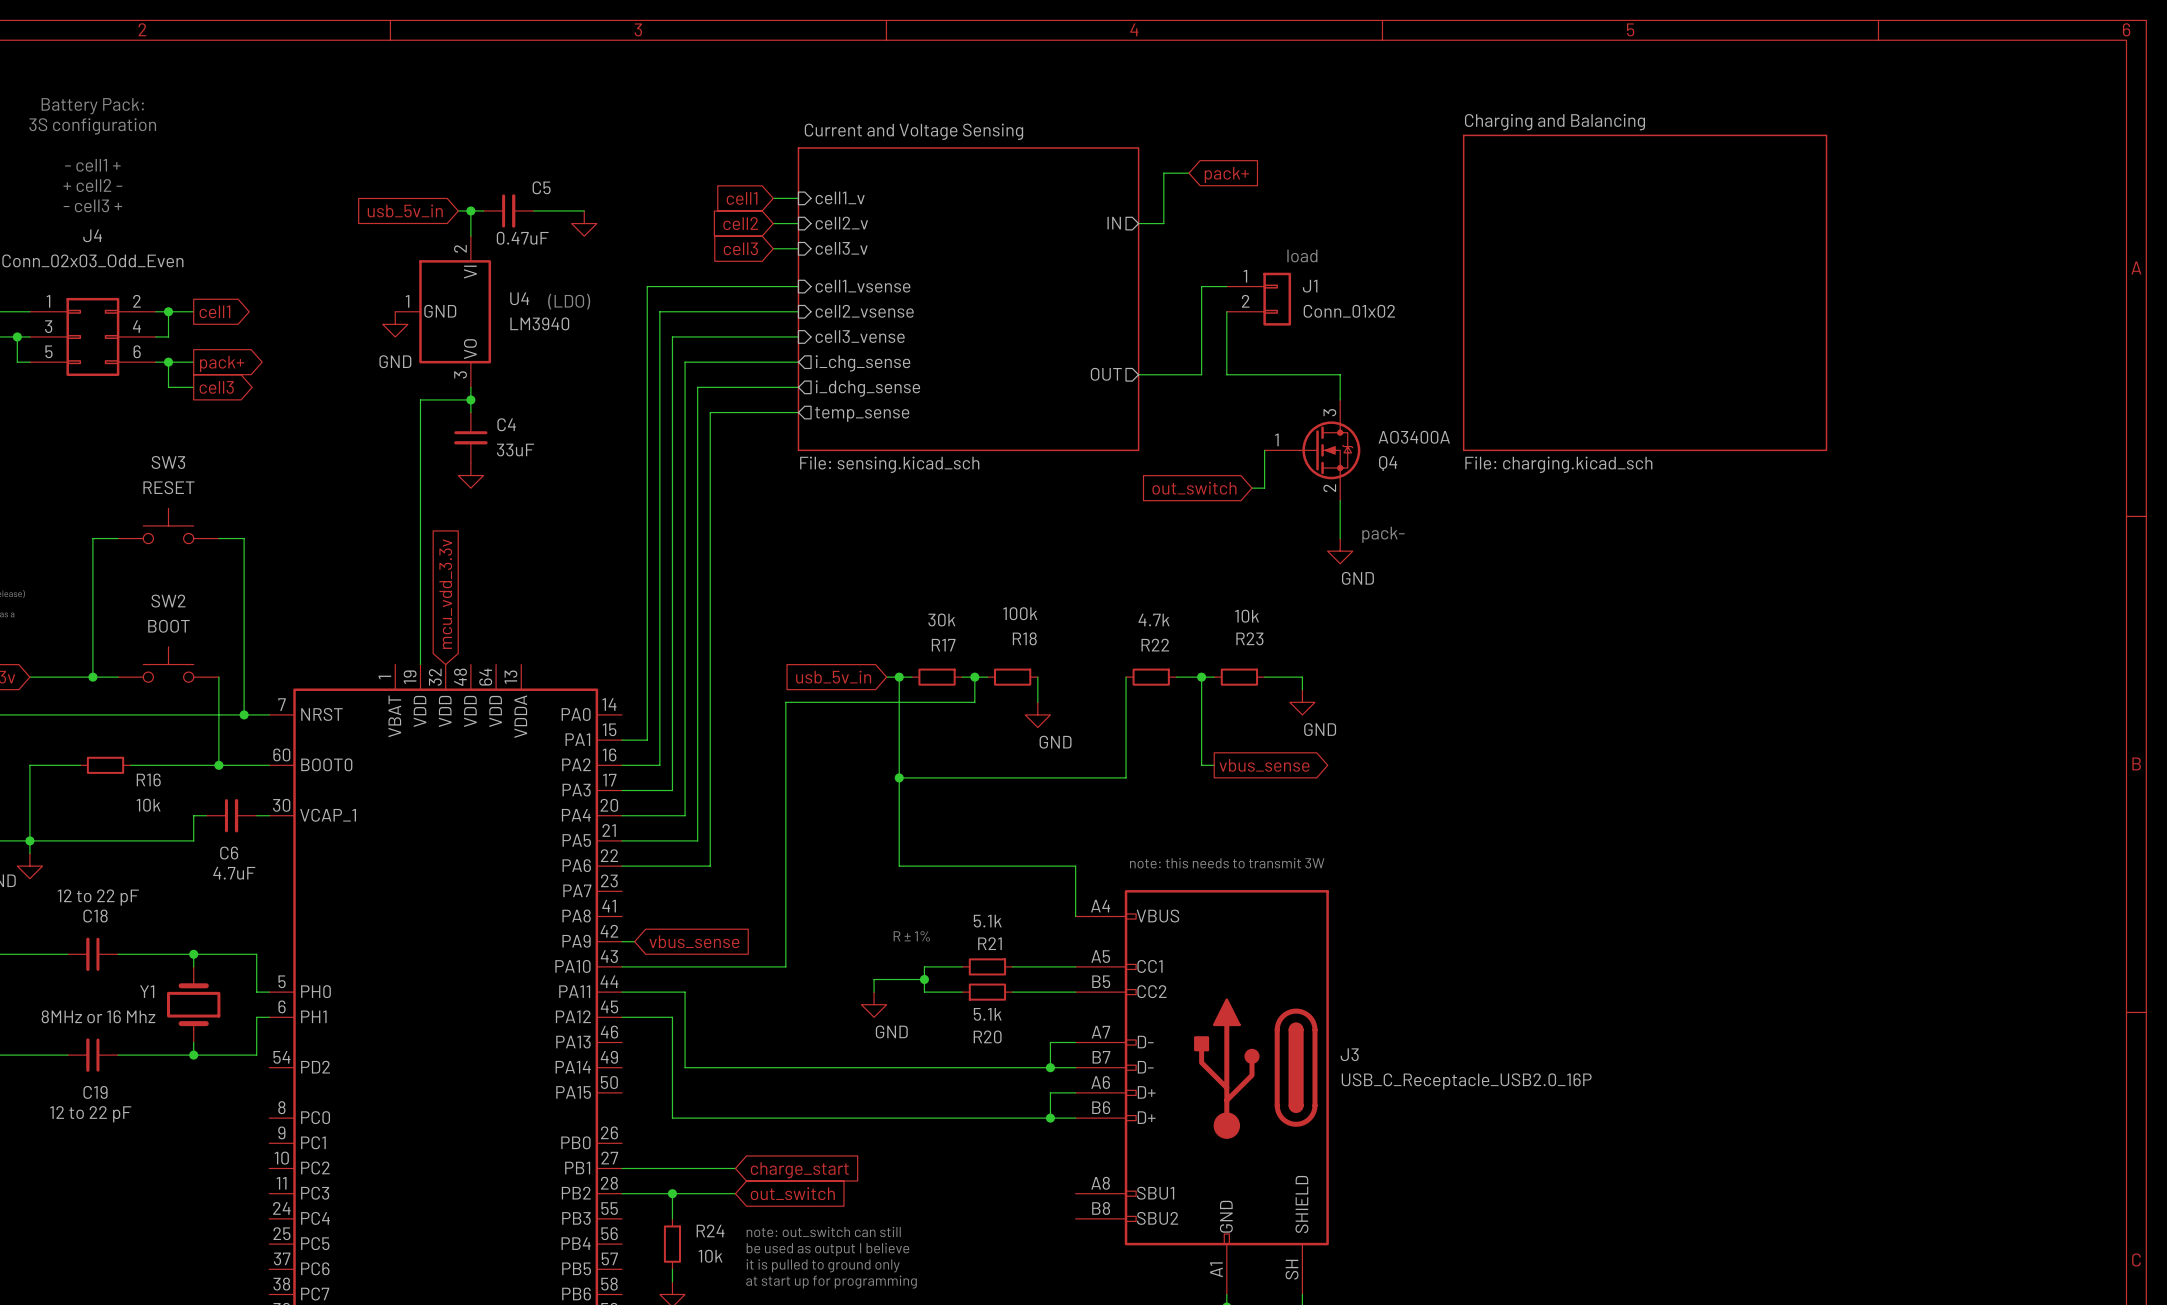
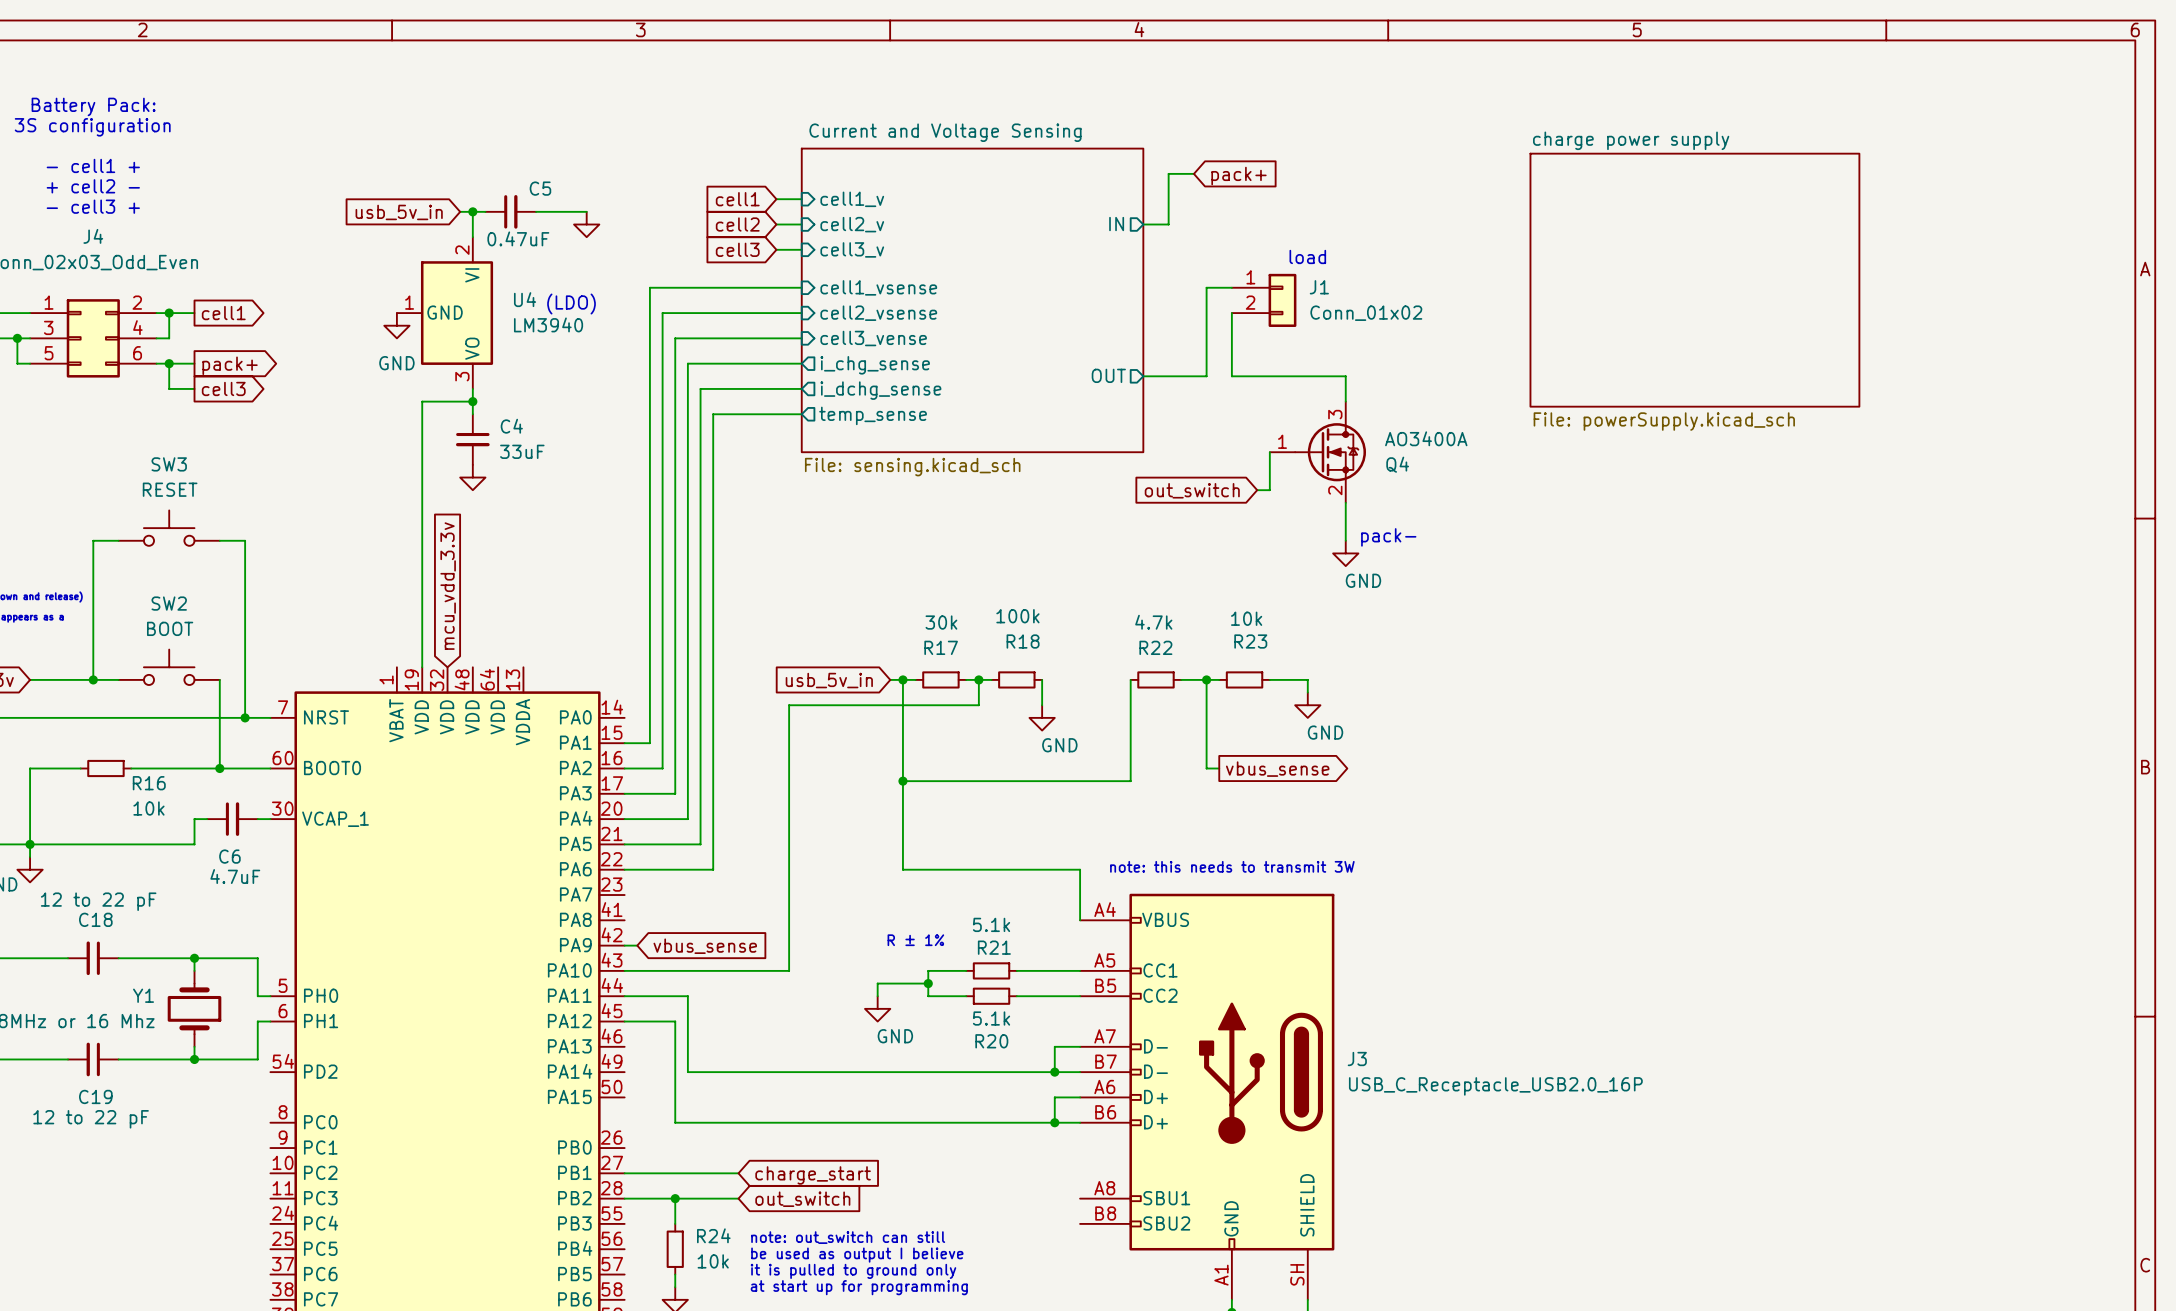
sheet charge power supply: none -> File: powerSupply.kicad_sch (1694, 280)
sheet Charging and Balancing: File: charging.kicad_sch (1645, 292) -> none

